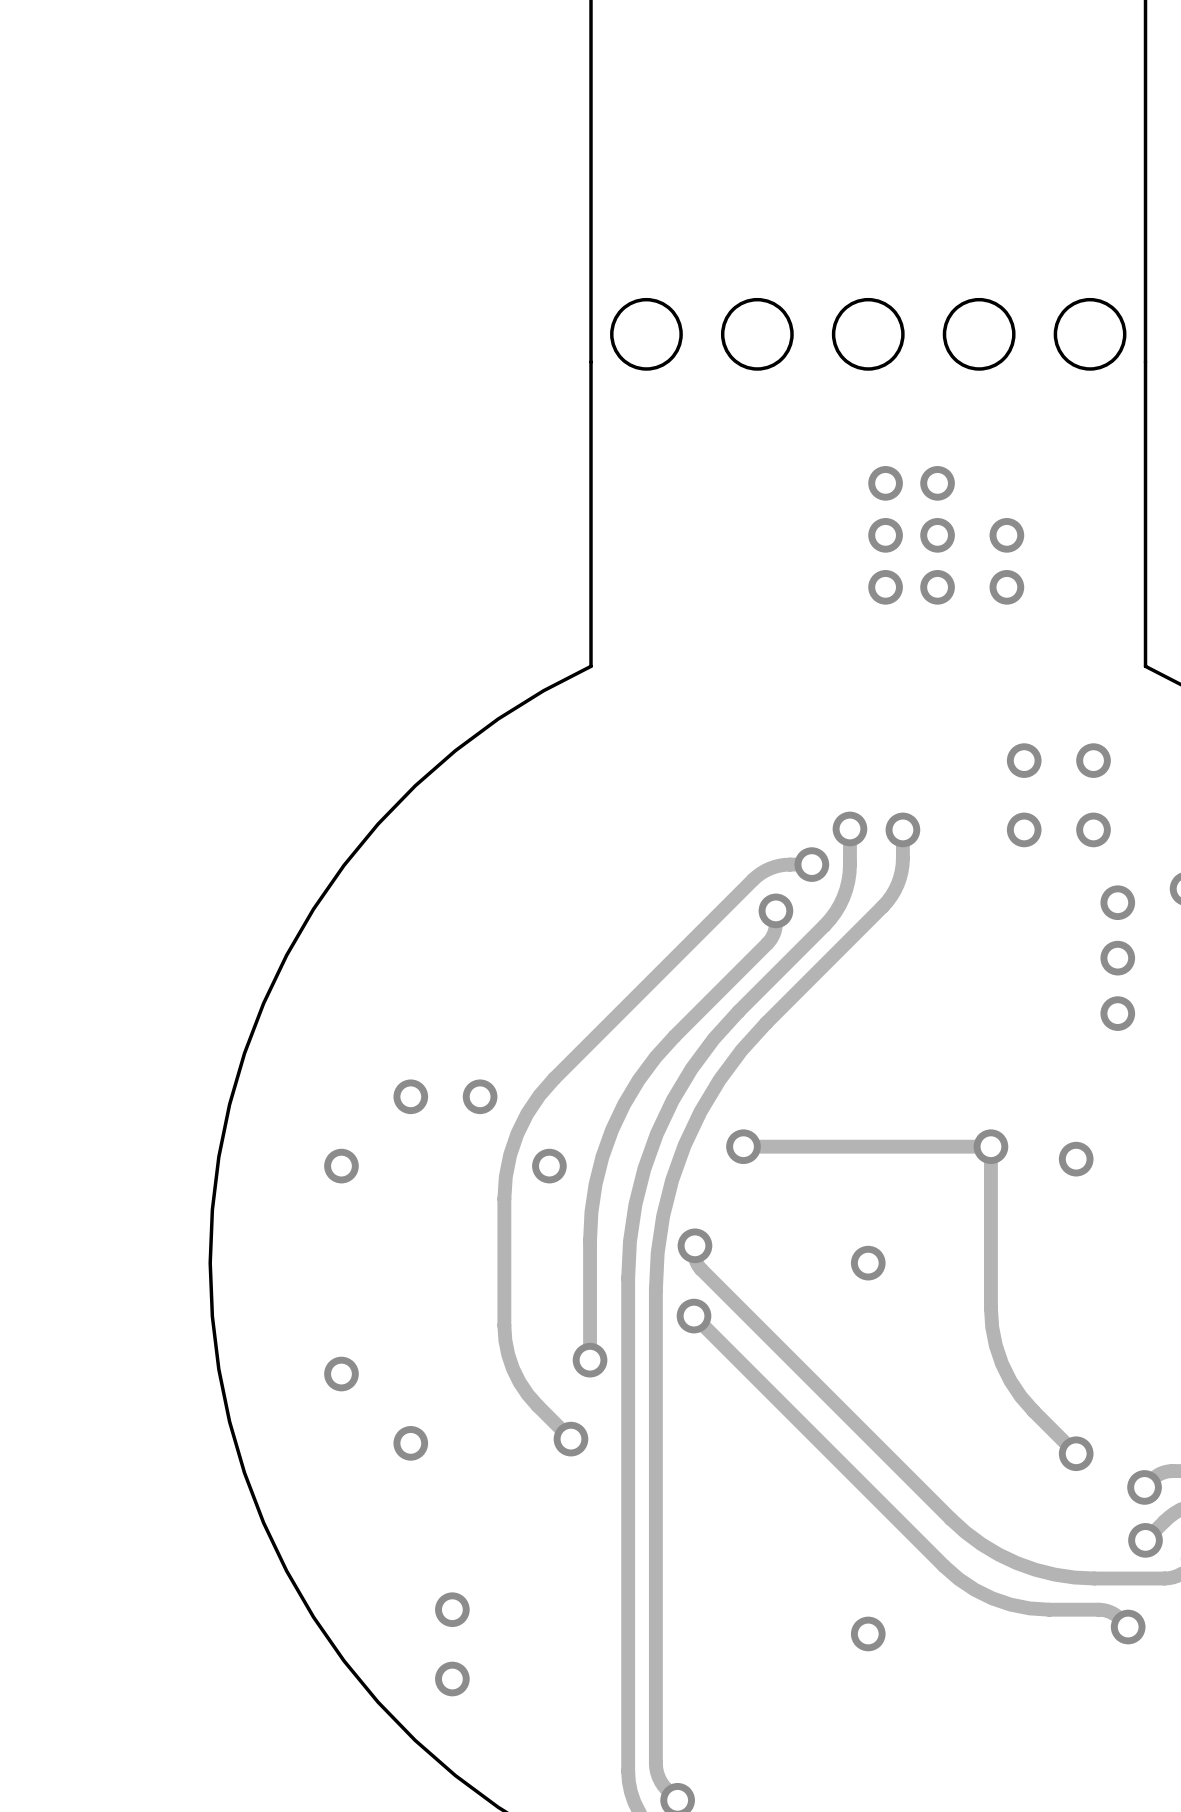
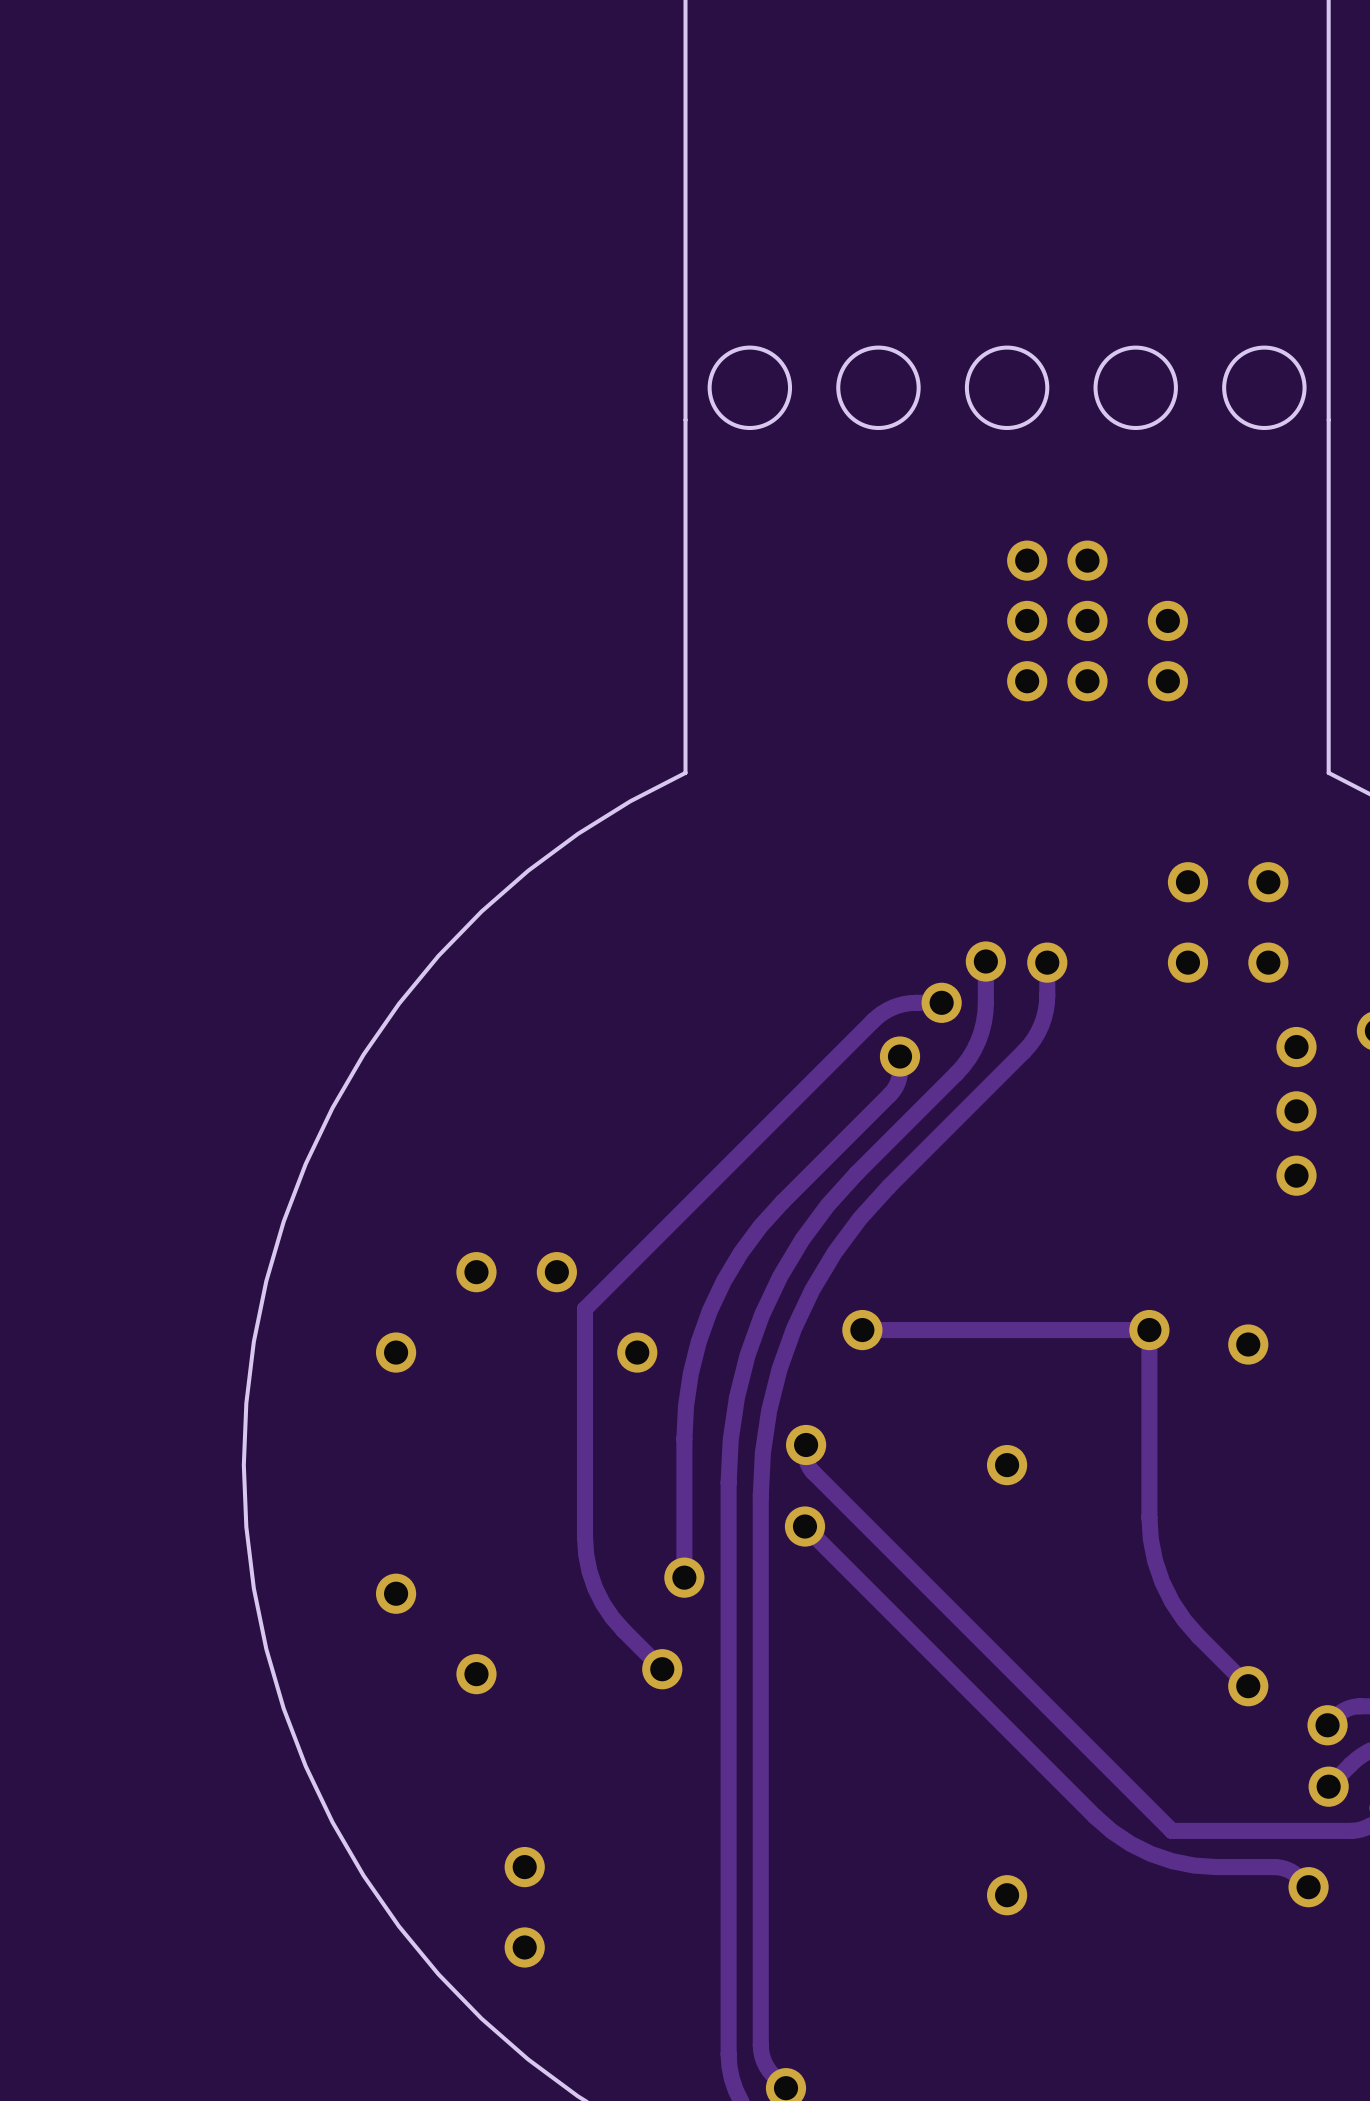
track: (554, 1078) (539, 1095) (517, 1133) (505, 1176) (504, 1198) -> (642, 1251) (585, 1308) (585, 1390)
track: (950, 1519) (981, 1544) (1016, 1563) (1054, 1574) (1094, 1578) -> (1102, 1761) (1171, 1830) (1269, 1830)

